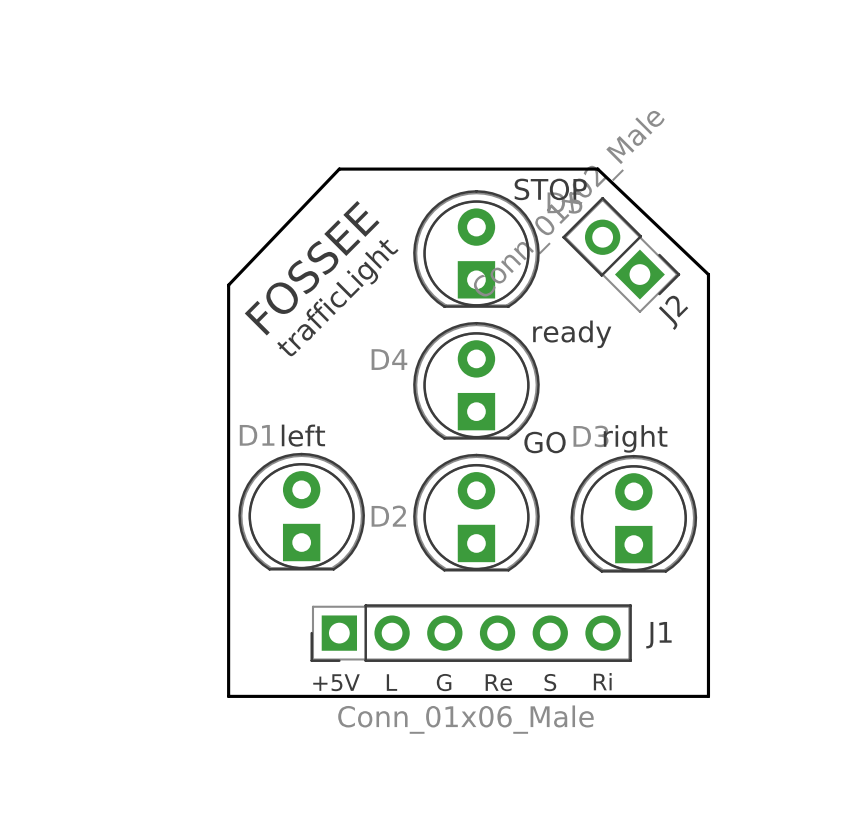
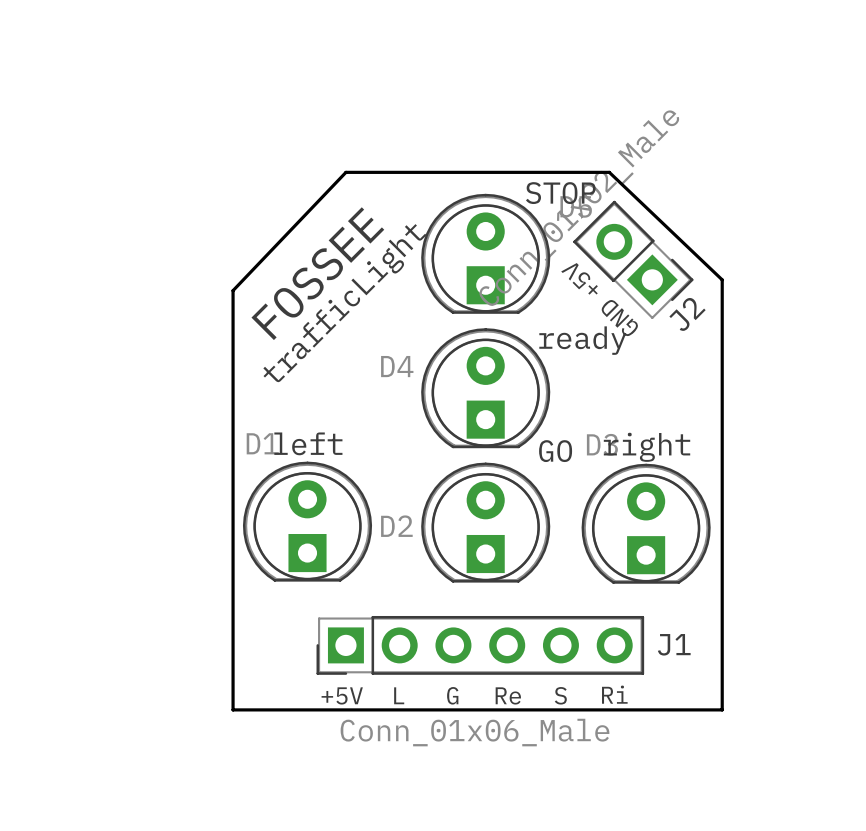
text: none -> +5V (579, 278)
text: none -> GND (619, 318)

